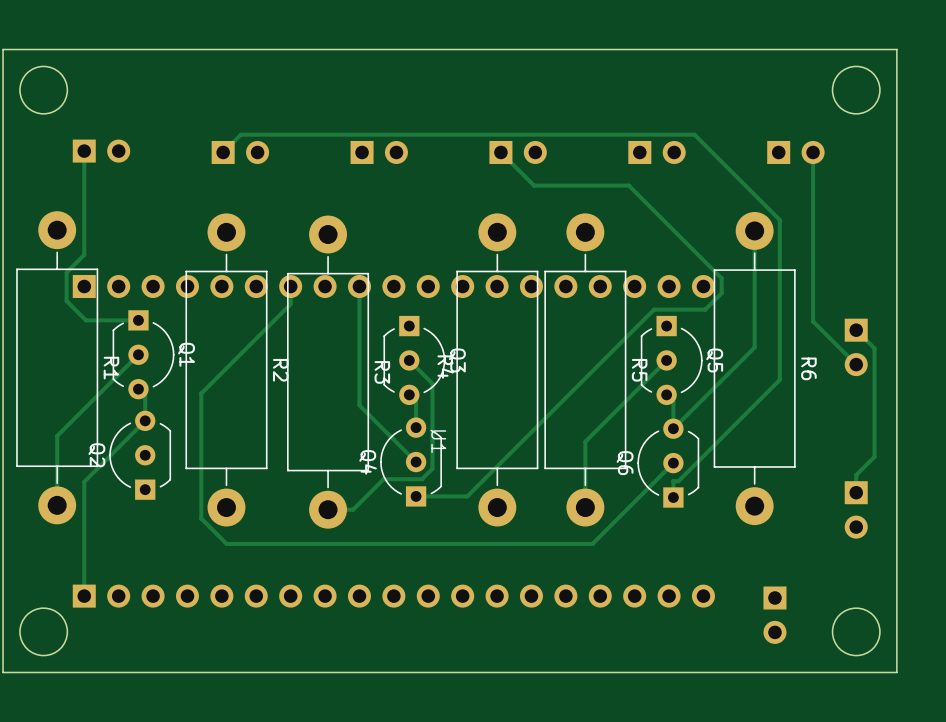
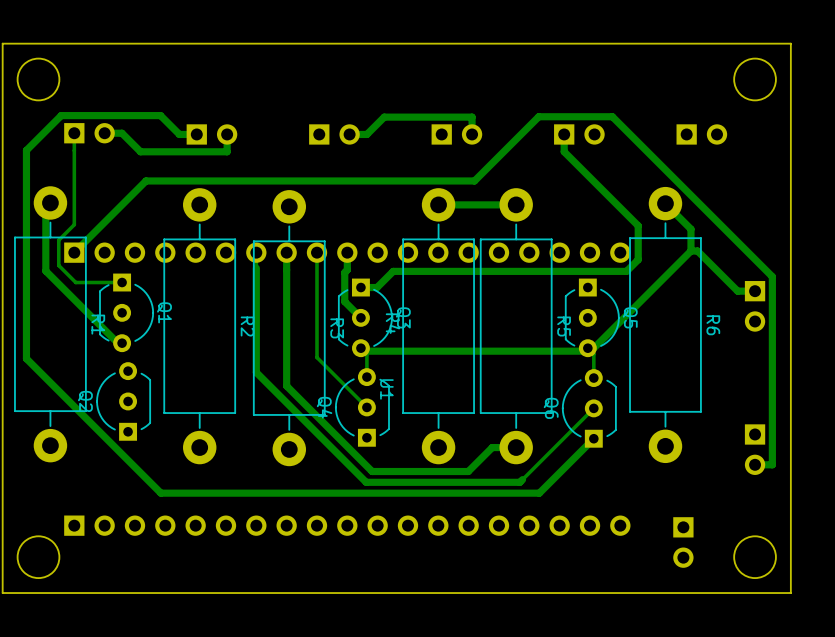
track: none -> (104, 133) (121, 133) (140, 151) (227, 151) (227, 134)
track: (223, 152) (240, 134) (694, 134) (779, 219) (779, 379) (678, 481) (673, 481) (673, 497) -> (196, 134) (179, 134) (160, 115) (61, 115) (26, 150) (26, 358) (160, 493) (539, 493) (593, 438)
track: (500, 152) (534, 185) (628, 185) (721, 278) (721, 293) (705, 309) (654, 309) (467, 496) (416, 496) -> none
track: none -> (472, 134) (472, 117) (384, 117) (366, 134) (349, 134)
track: none -> (564, 134) (564, 151) (638, 225) (638, 259) (626, 271) (393, 271) (377, 287) (360, 287)
track: (813, 152) (813, 321) (856, 364) -> none
track: (754, 230) (754, 347) (673, 428) -> (665, 203) (690, 229) (690, 251)
track: none -> (516, 204) (438, 204)
track: none -> (690, 251) (590, 351)
track: none -> (74, 252) (146, 180) (474, 180) (538, 116) (612, 116) (772, 276) (772, 464) (755, 464)
track: (290, 304) (201, 393) (201, 518) (226, 543) (592, 543) -> (256, 268) (256, 372) (366, 482) (519, 482) (522, 479)
track: (856, 330) (874, 348) (874, 456) (856, 475) (856, 492) -> (755, 291) (737, 291) (697, 251) (690, 251)
track: (138, 354) (57, 436) (57, 505) -> none
track: (409, 360) (432, 383) (432, 468) (422, 479) (383, 479) (353, 509) (328, 509) -> (360, 317) (344, 301) (344, 272) (347, 269) (347, 252)
track: (666, 360) (585, 441) (585, 507) -> (286, 252) (286, 386) (372, 471) (468, 471) (492, 447) (516, 447)
track: (138, 389) (145, 395) (145, 420) (84, 481) (84, 596) -> (122, 343) (117, 343) (45, 271) (45, 207) (50, 202)
track: none -> (587, 348) (584, 351) (363, 351)

